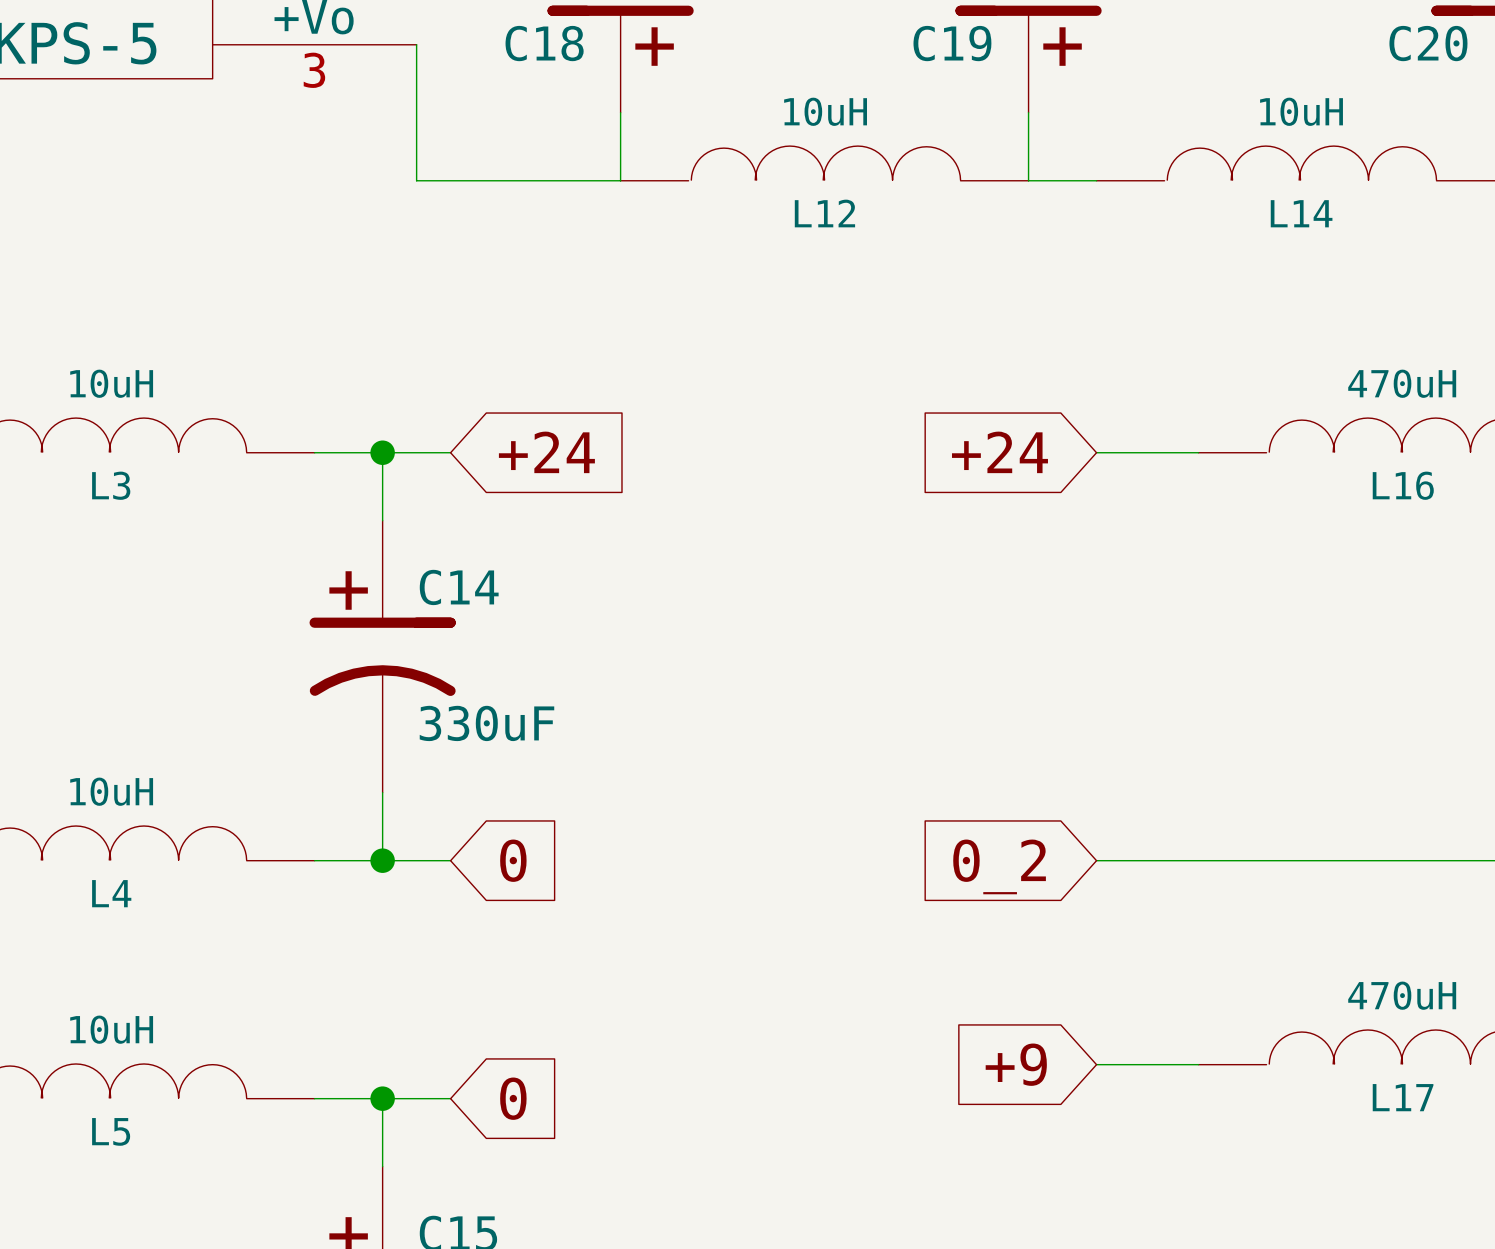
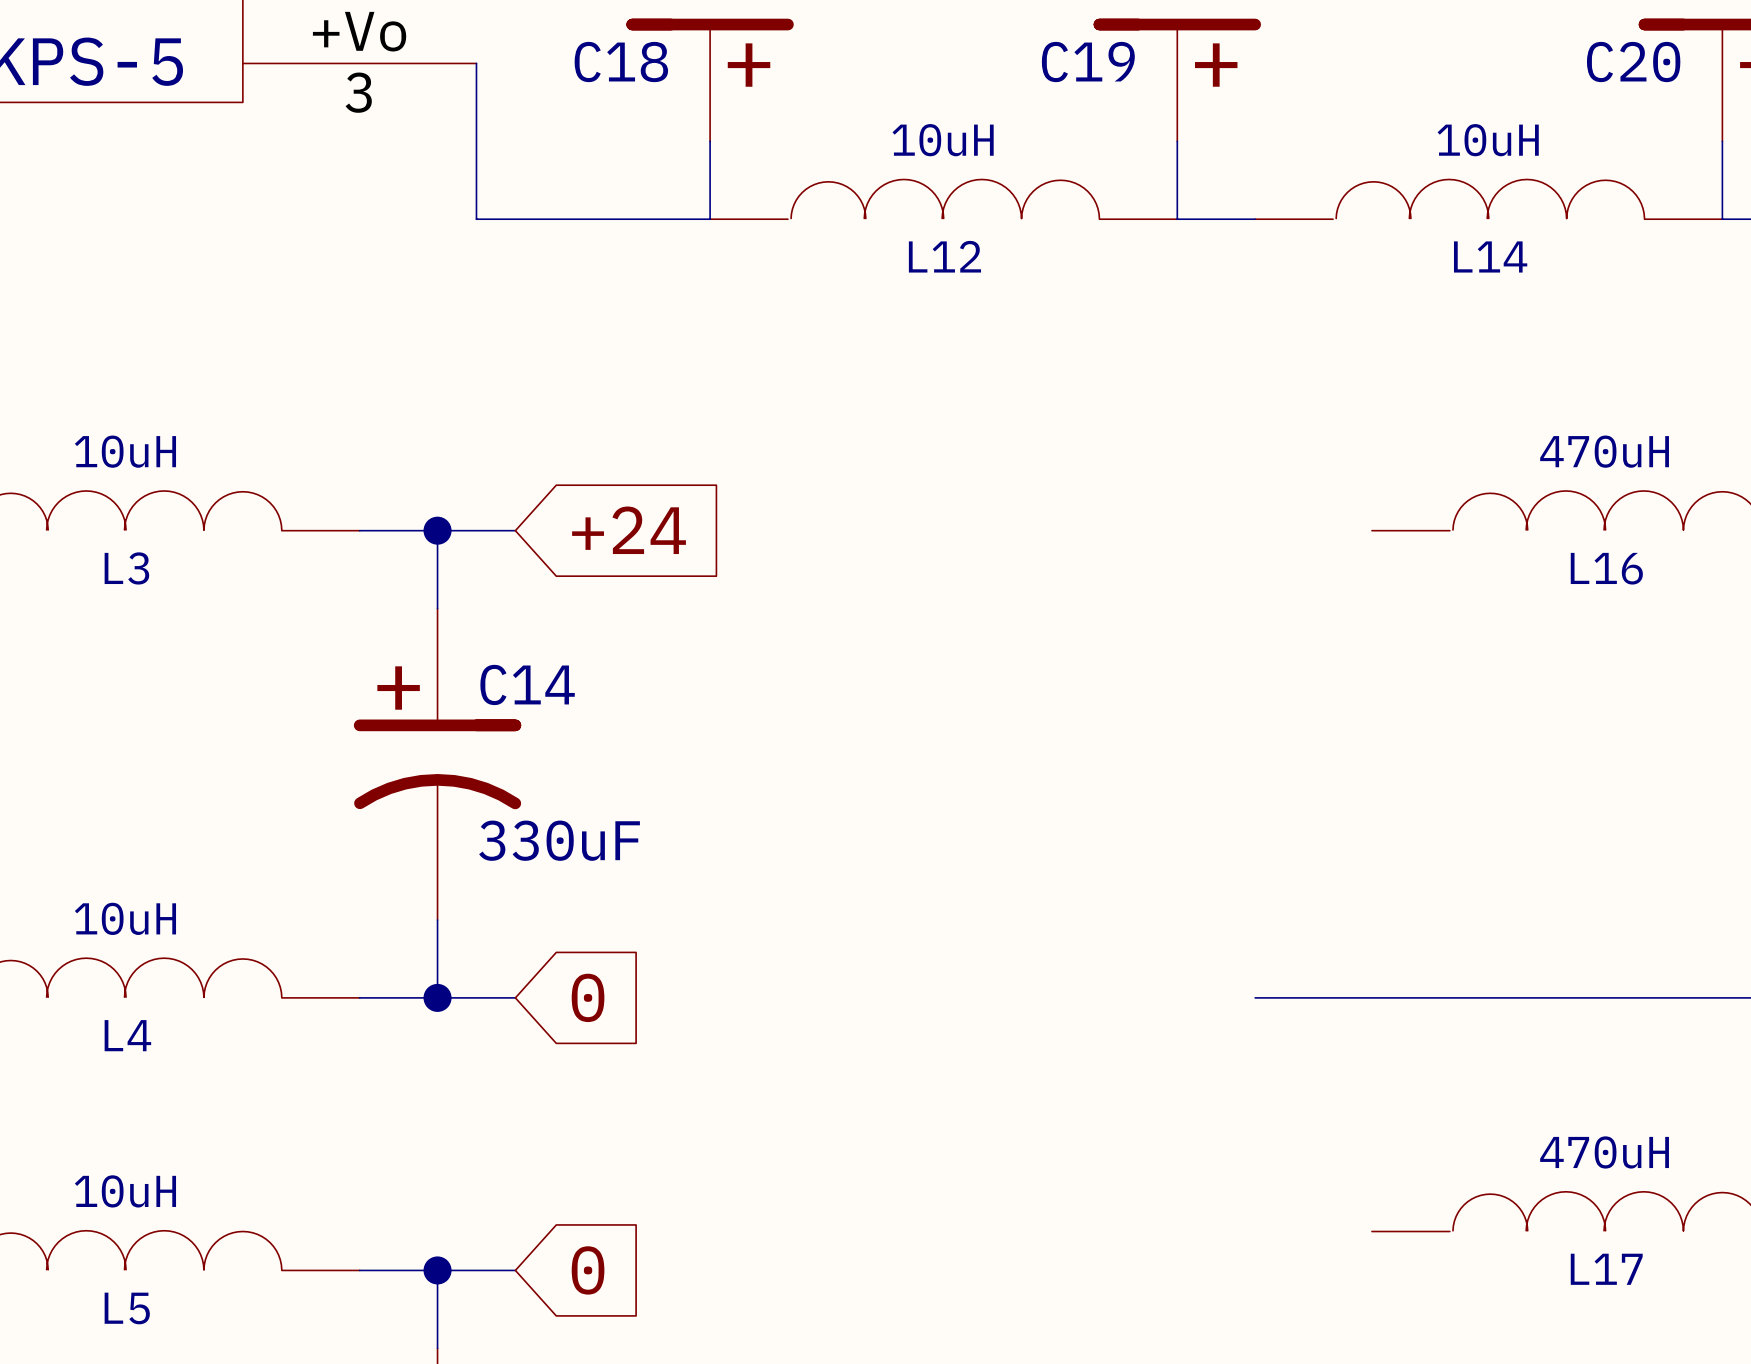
global label: +24 (999, 452) -> none
wire: (1096, 452) (1198, 452) -> none
global label: 0_2 (999, 866) -> none
global label: +9 (1016, 1064) -> none
wire: (1096, 1064) (1198, 1064) -> none

